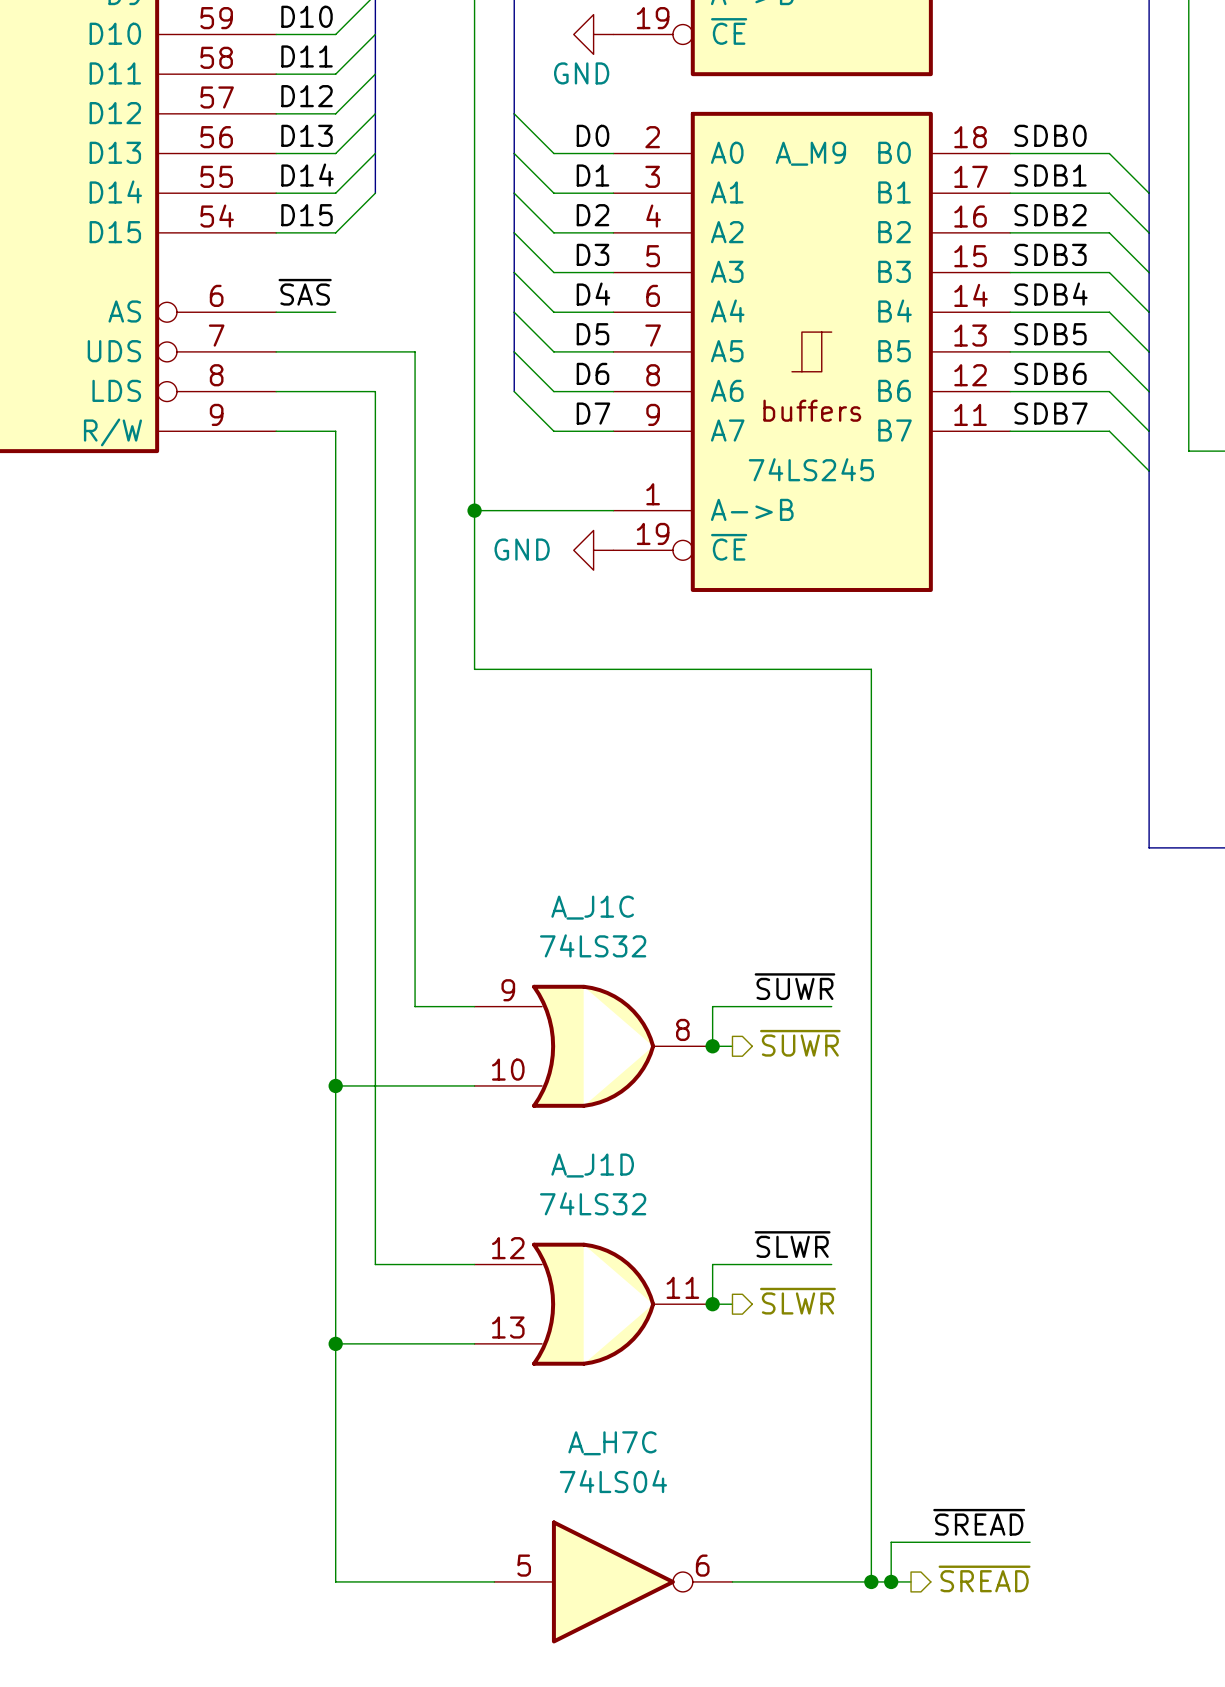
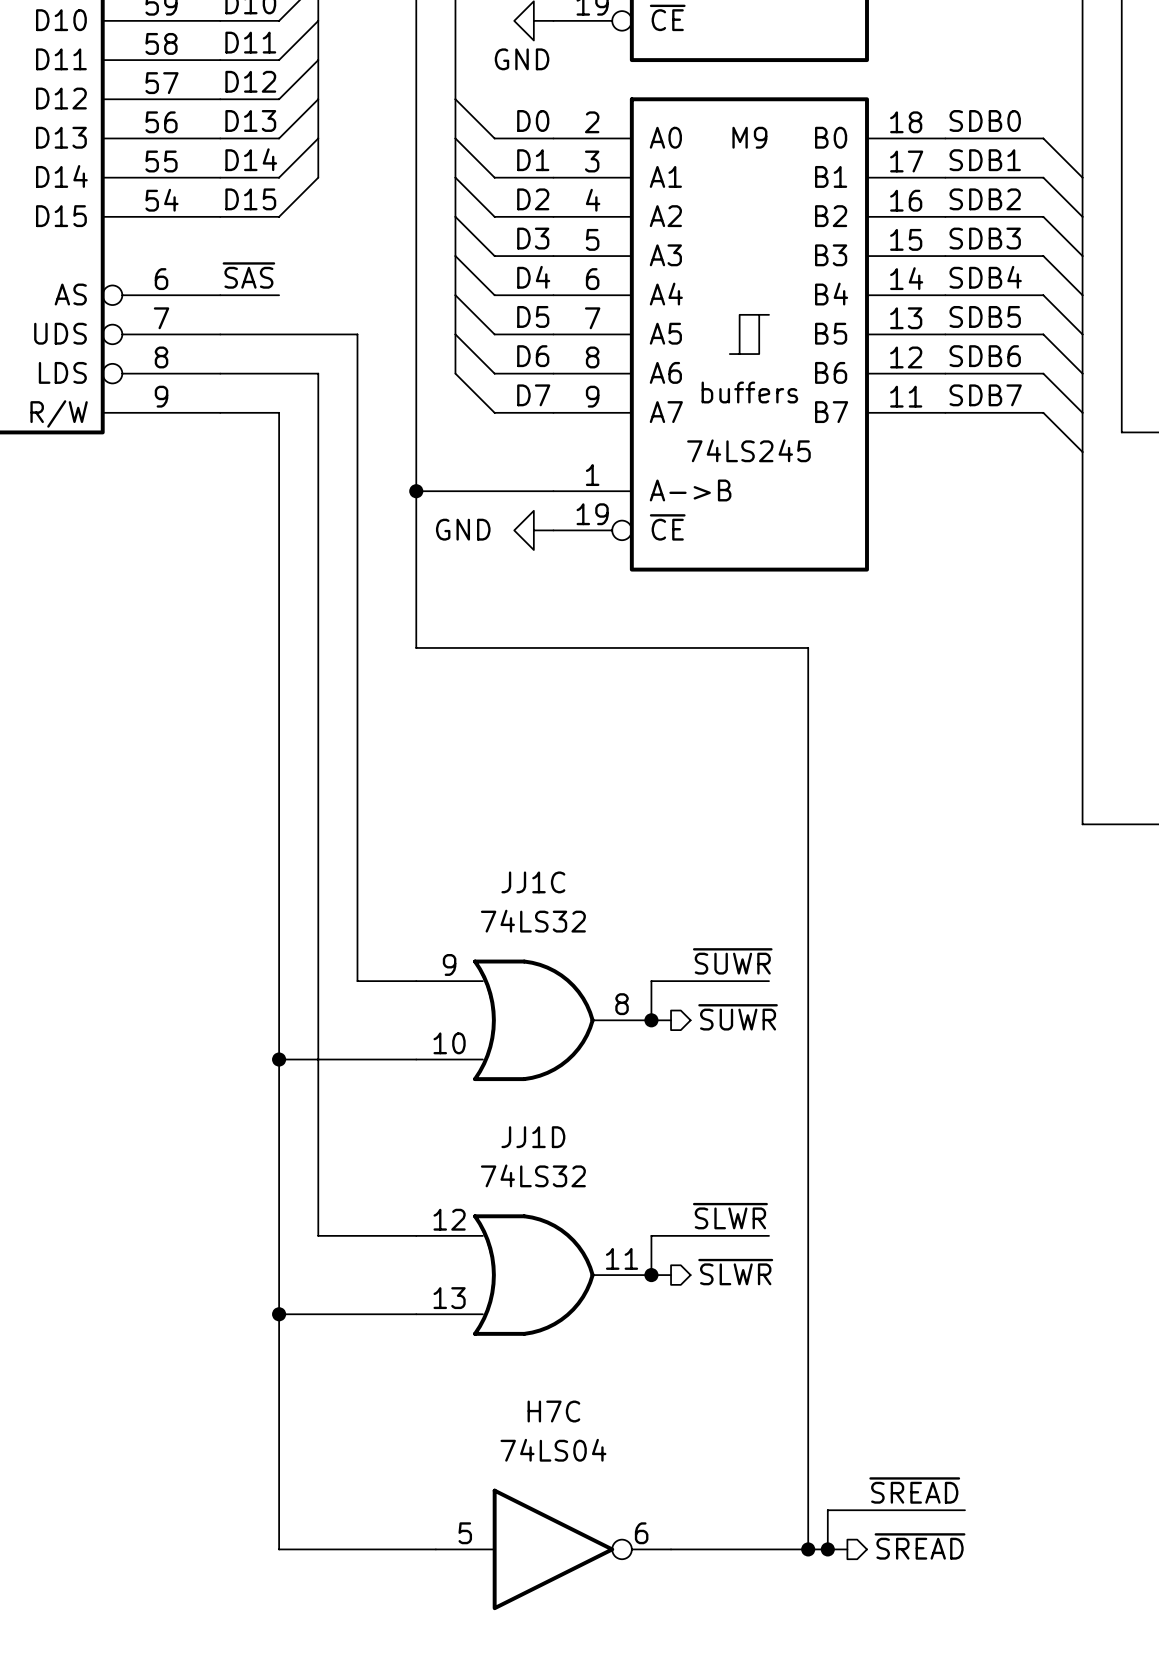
A_M9 name: A_M9 (810, 153) -> M9 (749, 137)
A_J1C name: A_J1C (592, 907) -> JJ1C (533, 882)
A_J1D name: A_J1D (592, 1165) -> JJ1D (533, 1137)
A_H7C name: A_H7C (612, 1443) -> H7C (553, 1411)

